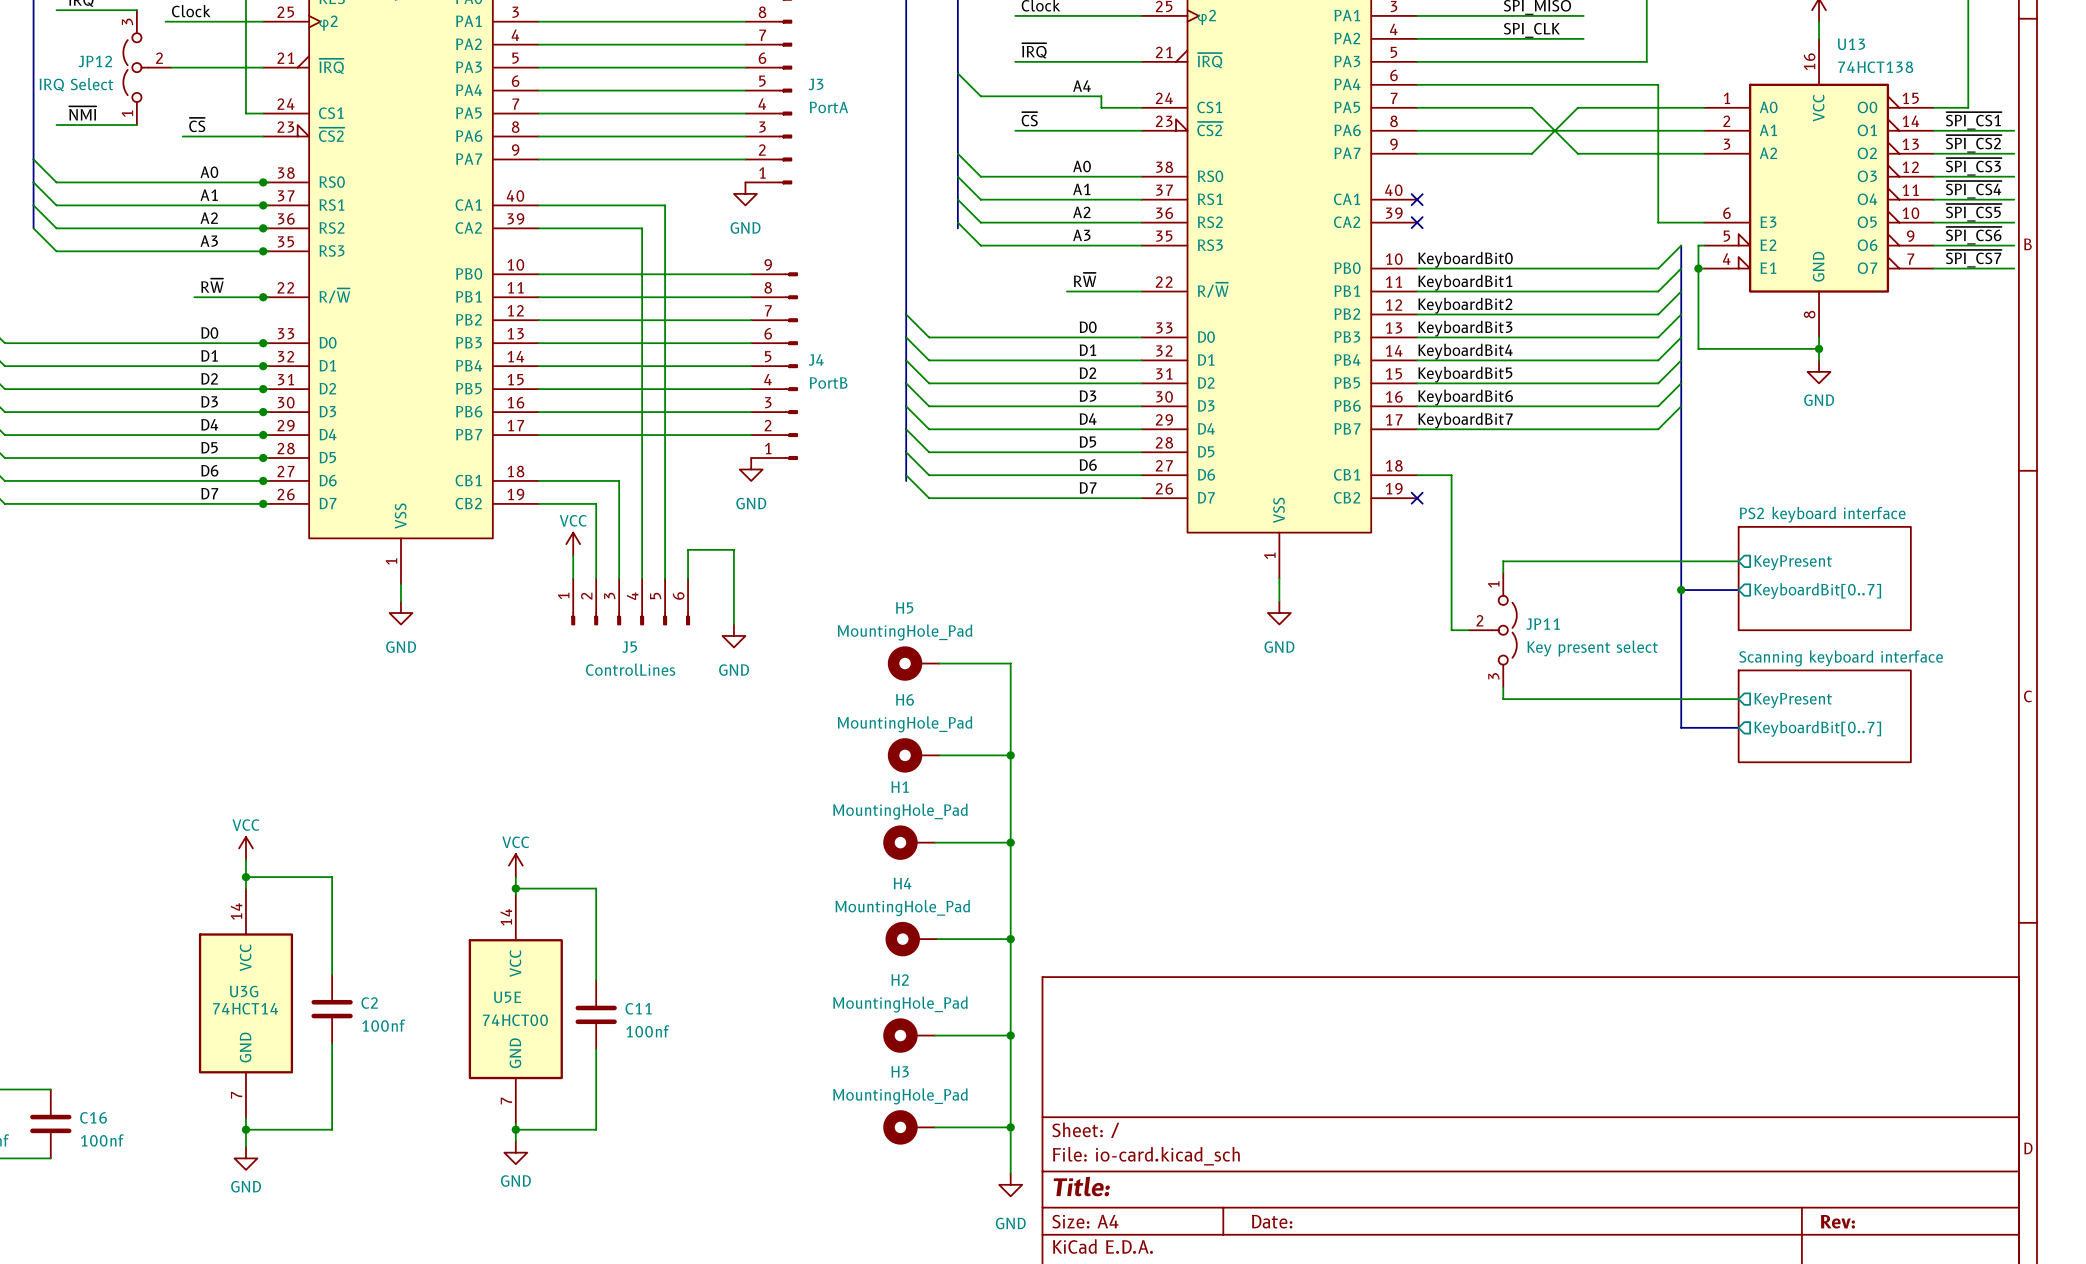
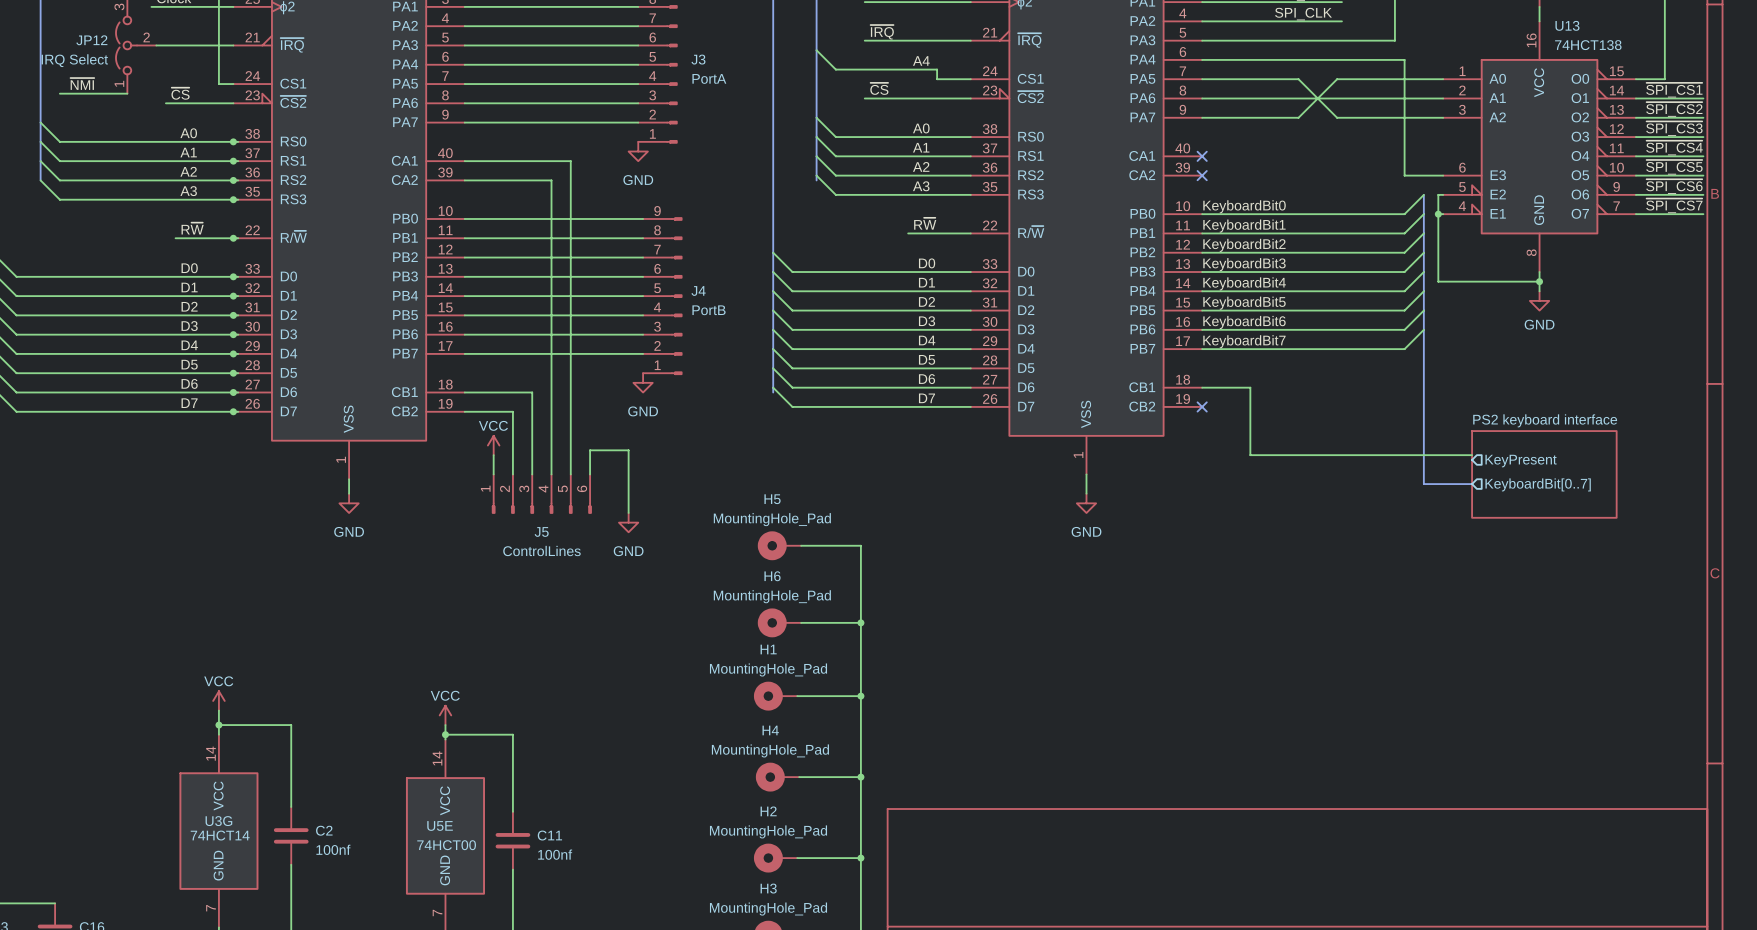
wire: (1451, 475) (1451, 630) (1468, 630) -> (1231, 387) (1250, 387) (1250, 455) (1472, 455)
wire: (1738, 561) (1503, 561) (1503, 572) -> none
bus: (1681, 590) (1681, 727) (1738, 727) -> none
junction: (1681, 590) -> none
JP11: Key present select (1492, 630) -> none
wire: (1503, 687) (1503, 699) (1738, 699) -> none
sheet pin: KeyPresent (1793, 700) -> none
sheet Scanning keyboard interface: (1824, 716) -> none
sheet pin: KeyboardBit[0..7] (1817, 728) -> none

